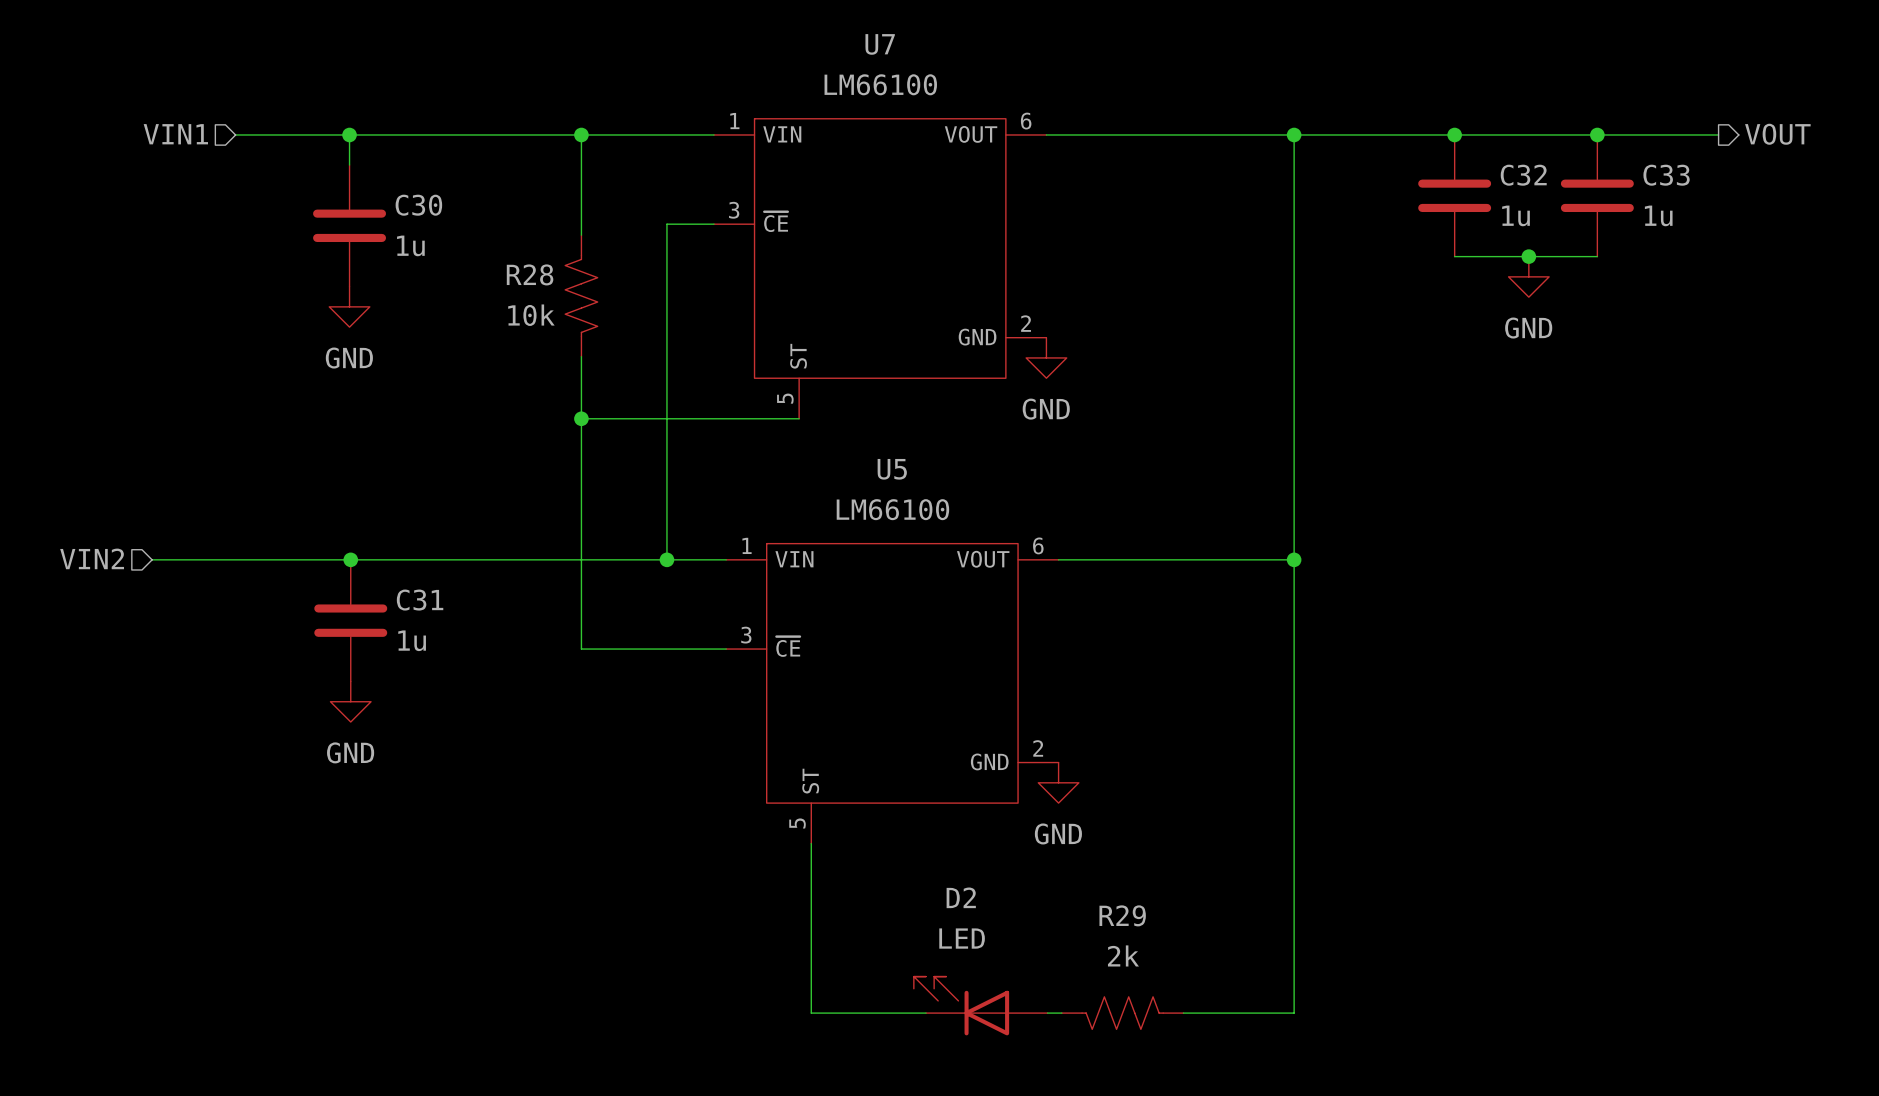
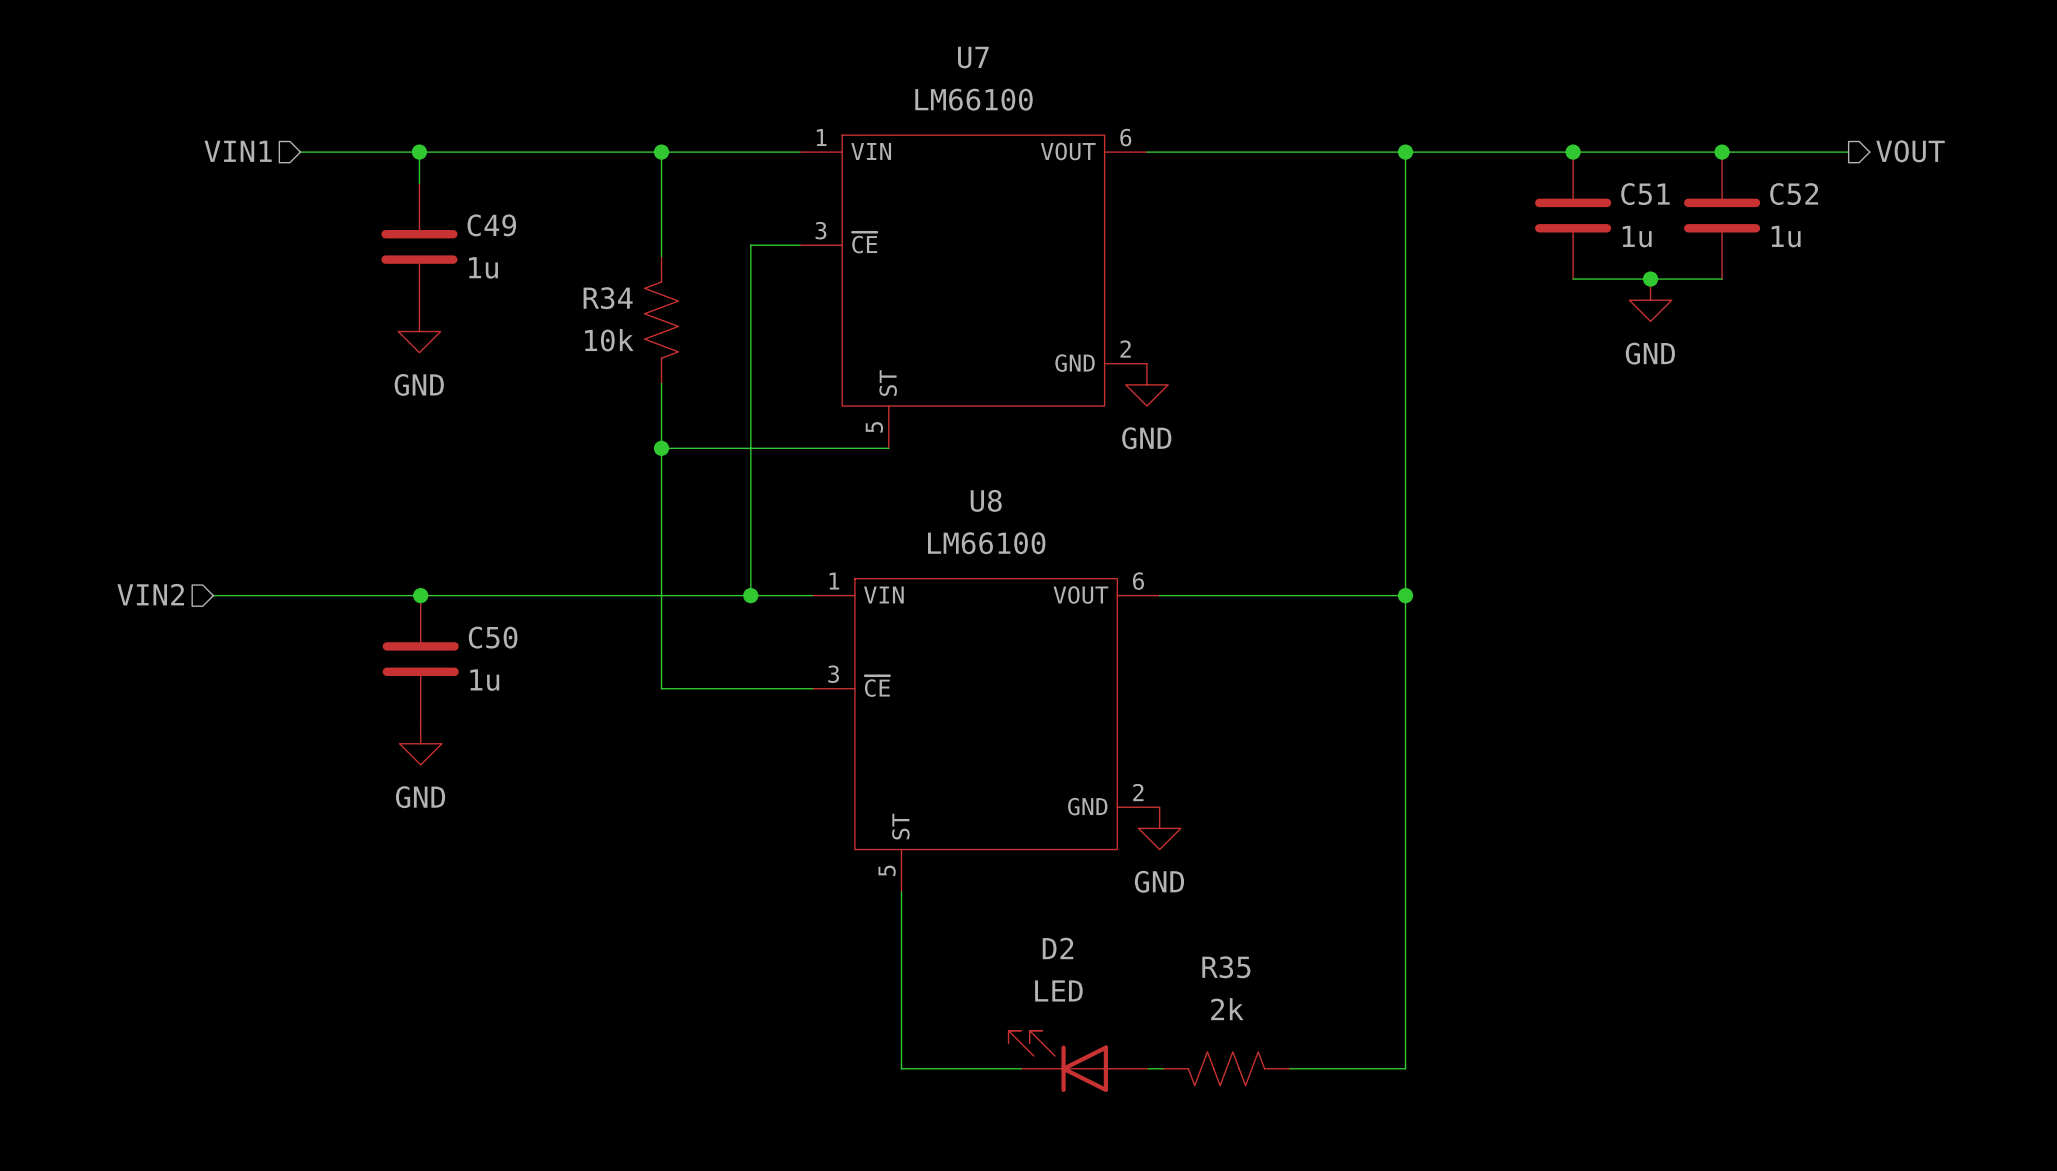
C32 name: C32 (1523, 175) -> C51 (1645, 194)
C33 name: C33 (1666, 175) -> C52 (1794, 194)
C30 name: C30 (418, 205) -> C49 (491, 225)
R28 name: R28 (530, 274) -> R34 (608, 298)
U5 name: U5 (892, 469) -> U8 (986, 500)
C31 name: C31 (420, 600) -> C50 (493, 637)
R29 name: R29 (1122, 915) -> R35 (1226, 967)

